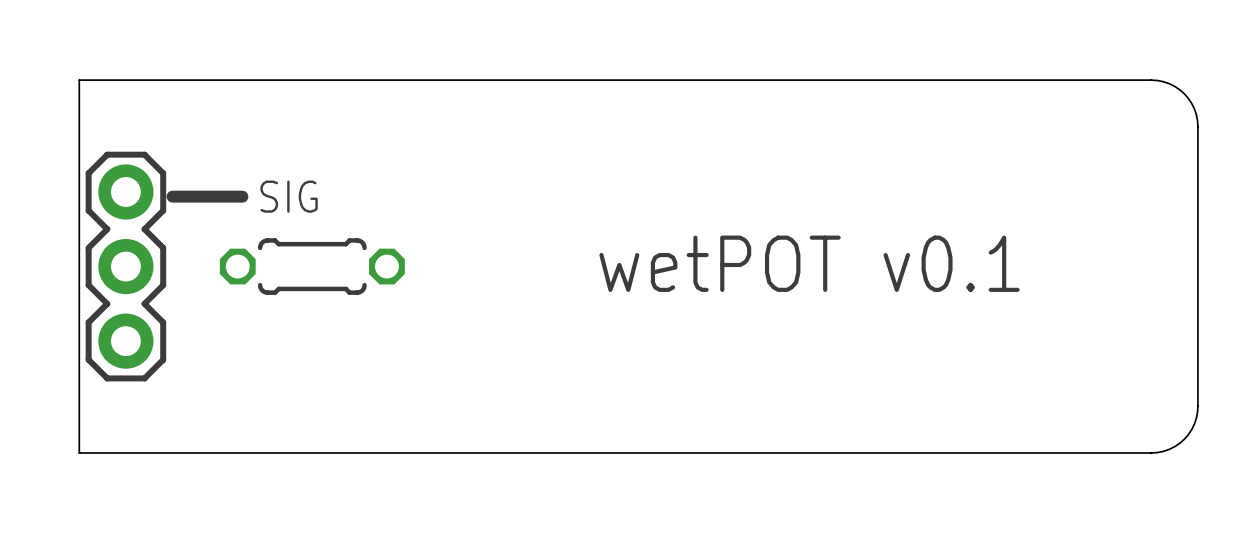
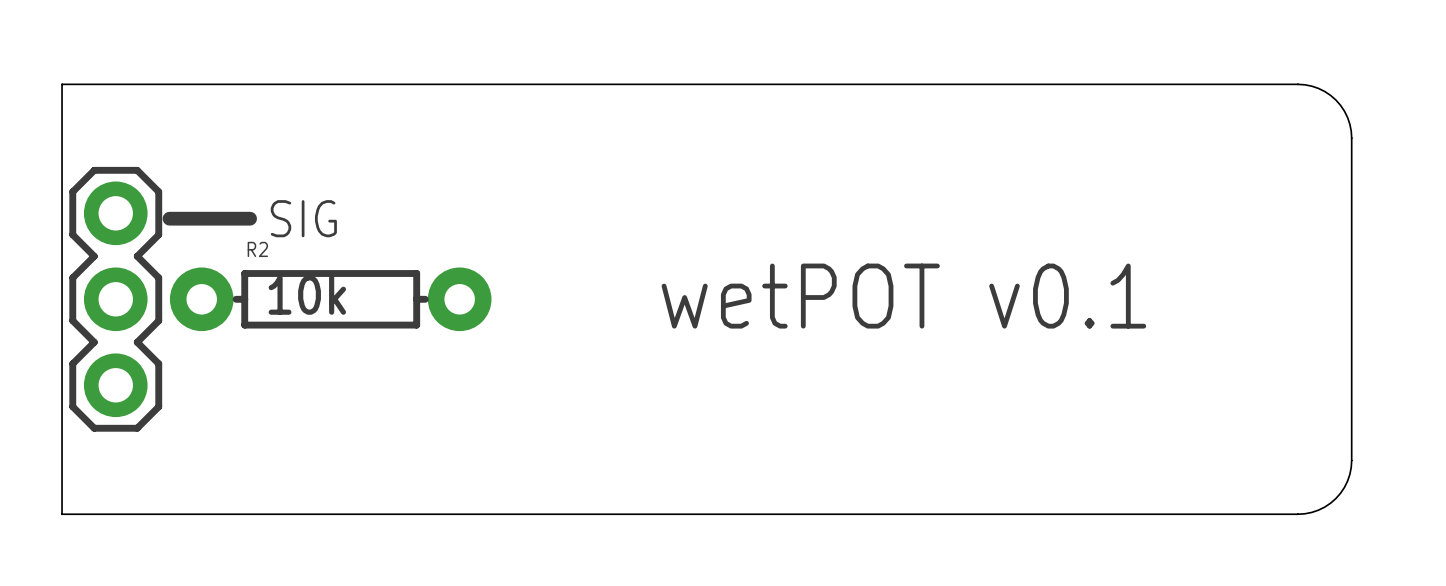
part: (312, 266) -> none
R2: none -> 10k (330, 299)

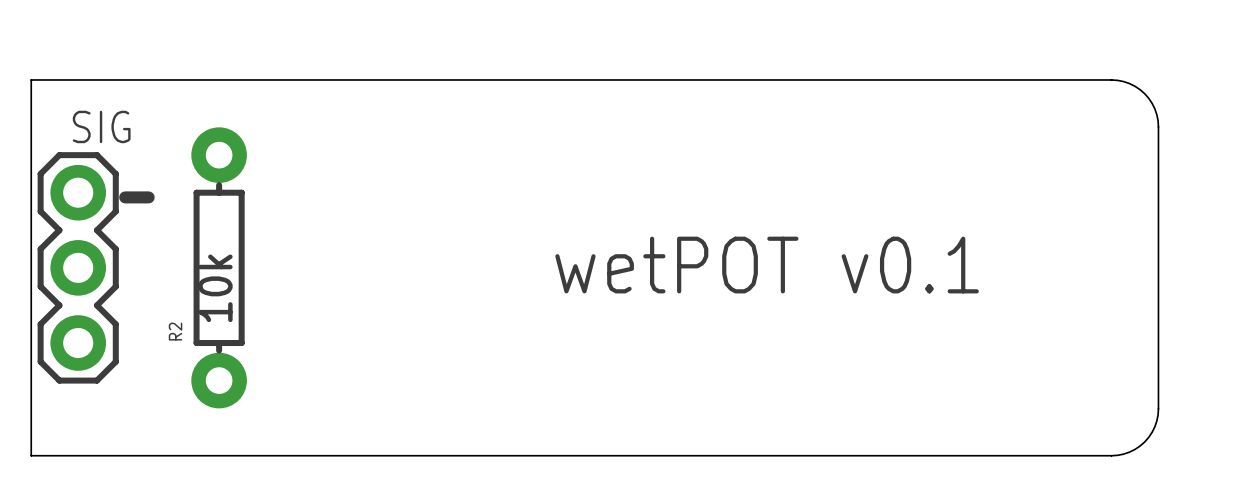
line: (196, 218) (250, 218) -> none
text position: SIG (303, 218) -> SIG (101, 126)
R2 name position: R2 (257, 249) -> R2 (175, 331)
R2 rotation: 0° (330, 299) -> 90° clockwise (219, 267)

